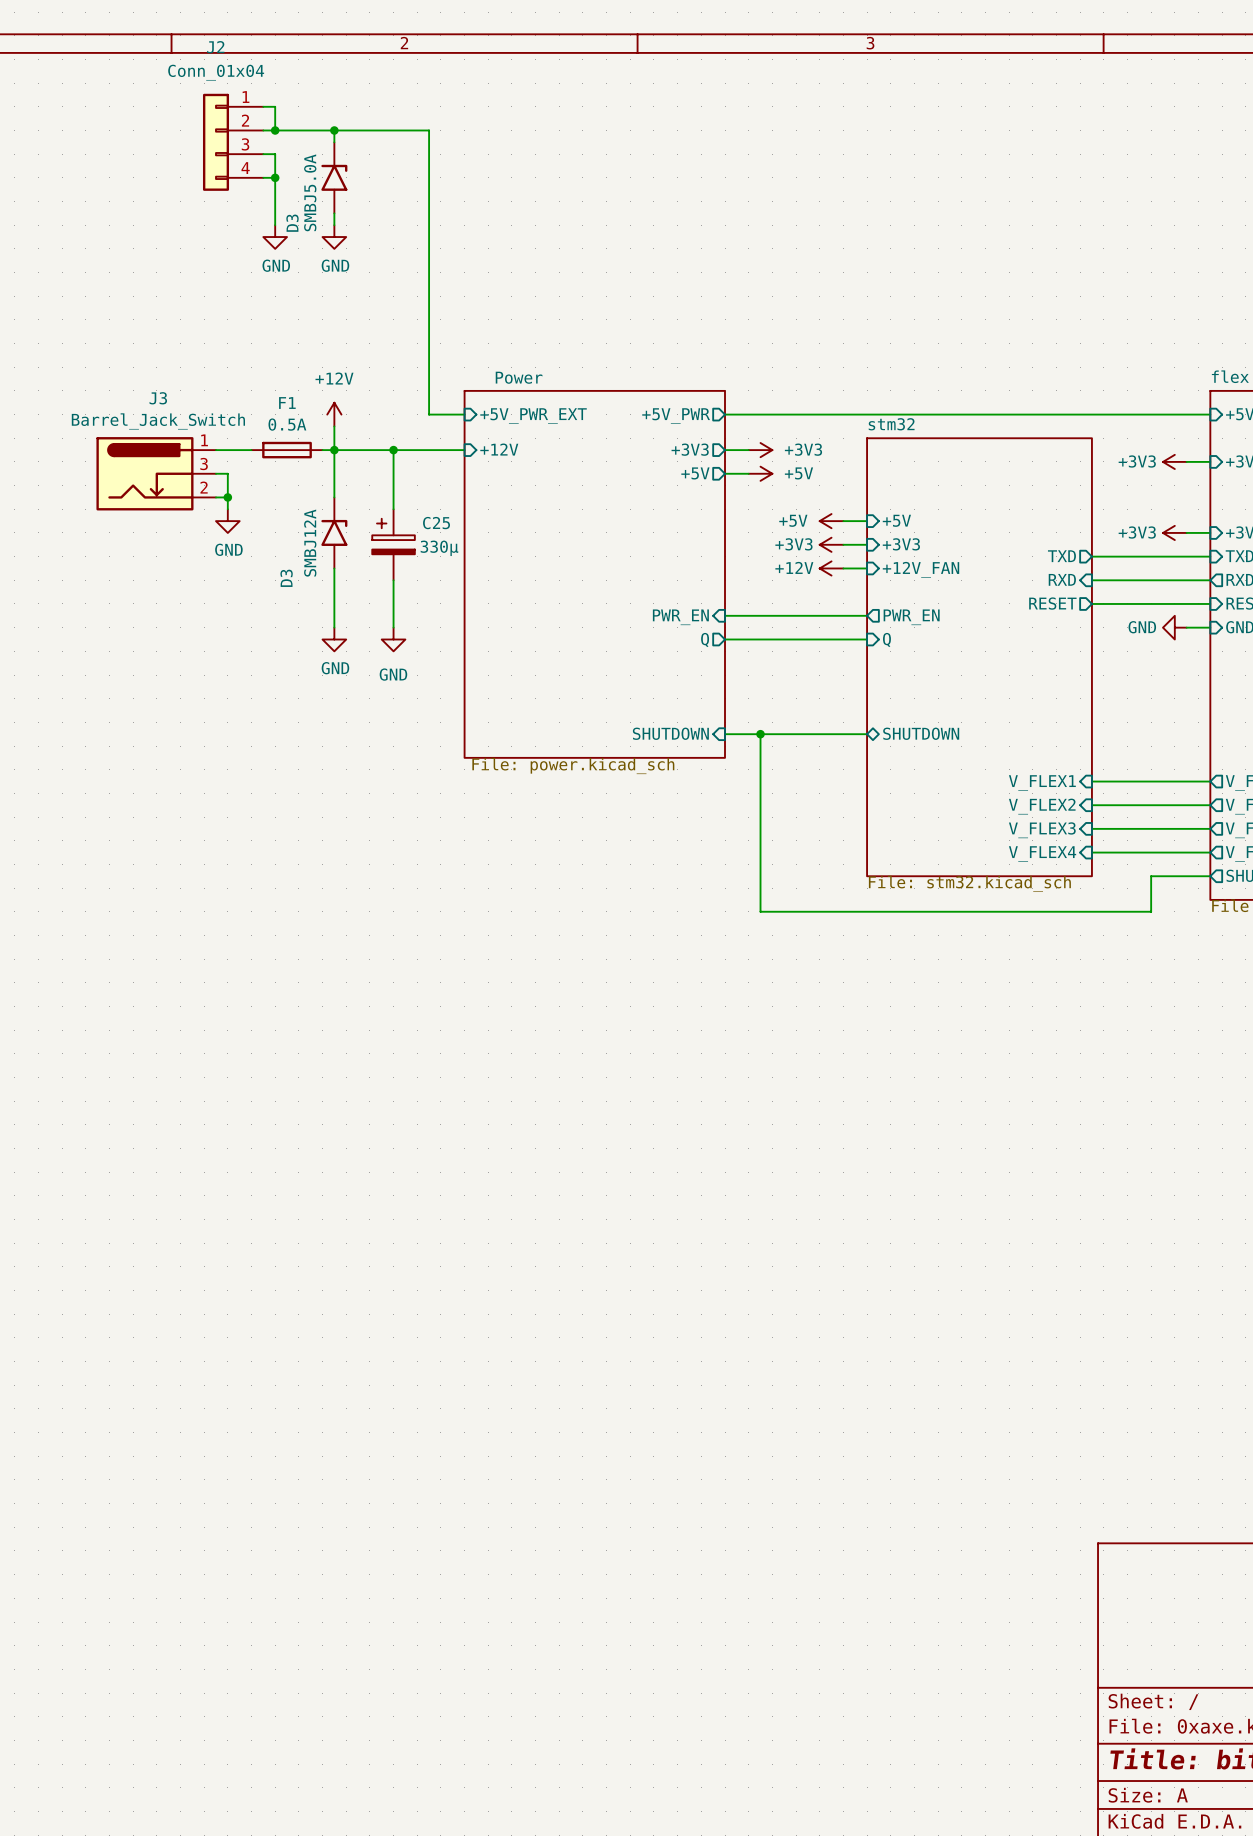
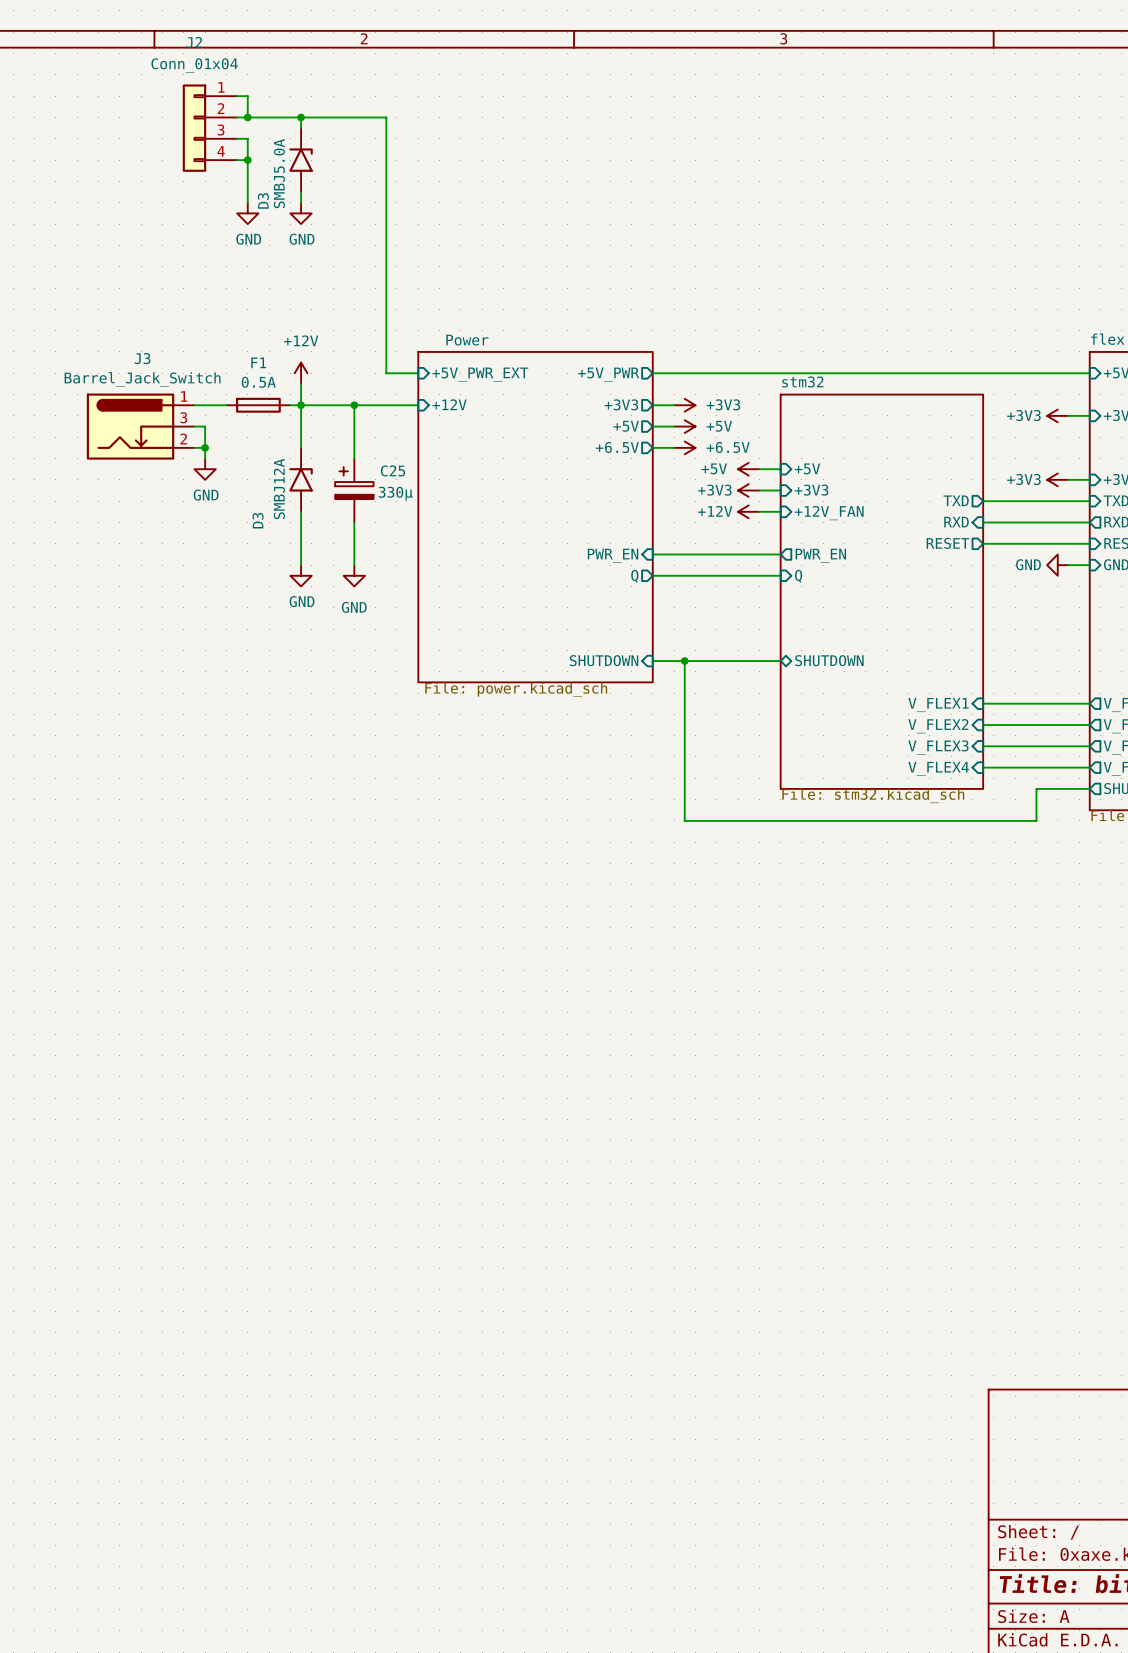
sheet pin: none -> +6.5V (617, 447)
wire: none -> (652, 447) (674, 447)
power symbol: none -> +6.5V (684, 447)

